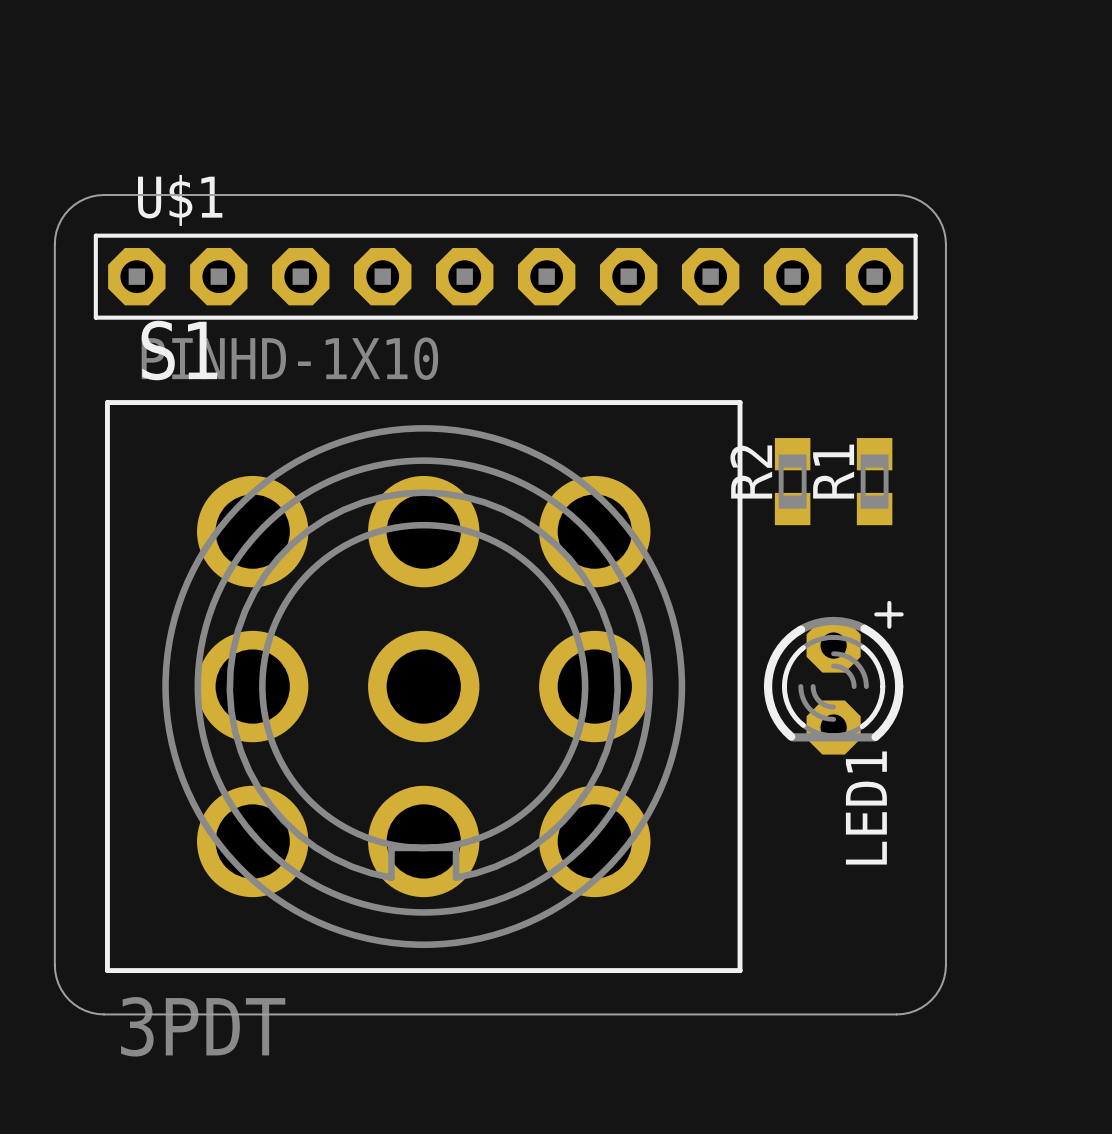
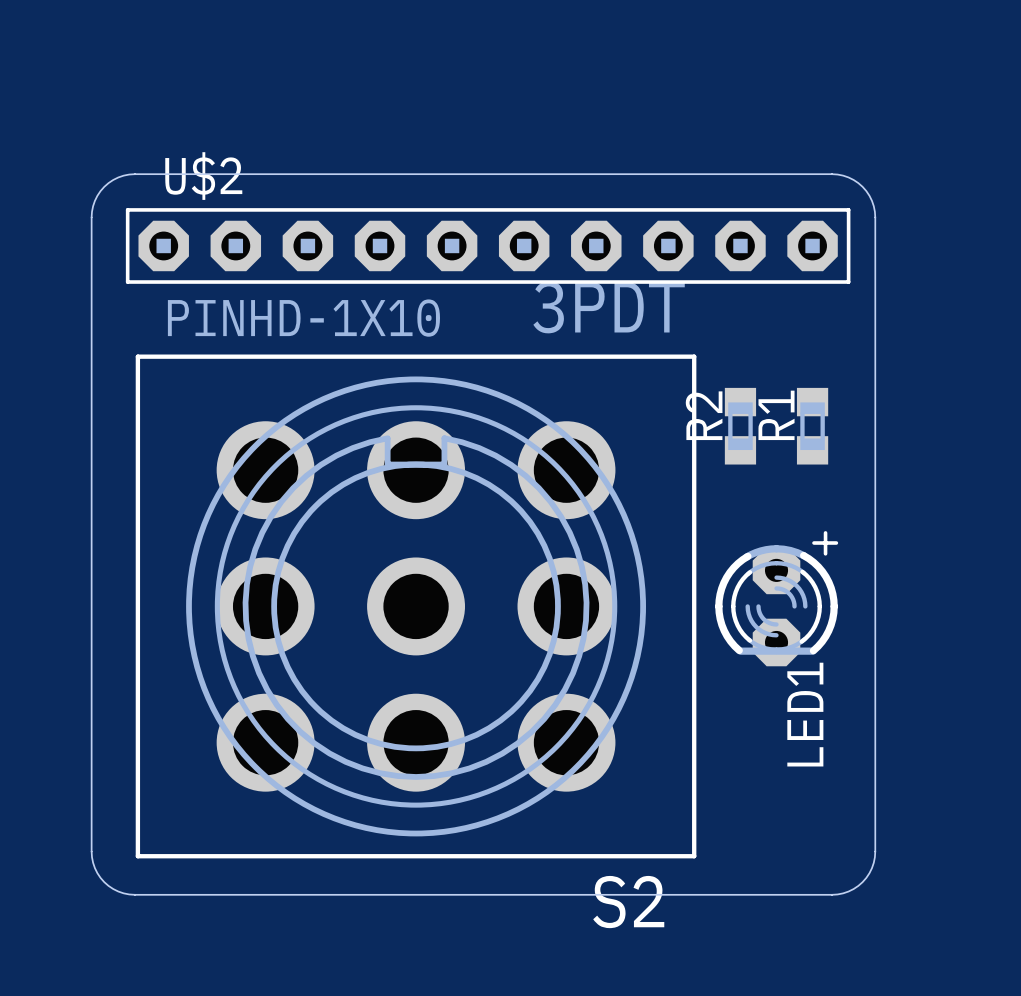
U$1 name: U$1 (180, 200) -> U$2 (203, 176)
S1: 3PDT (423, 686) -> none
S2: none -> 3PDT (416, 606)

